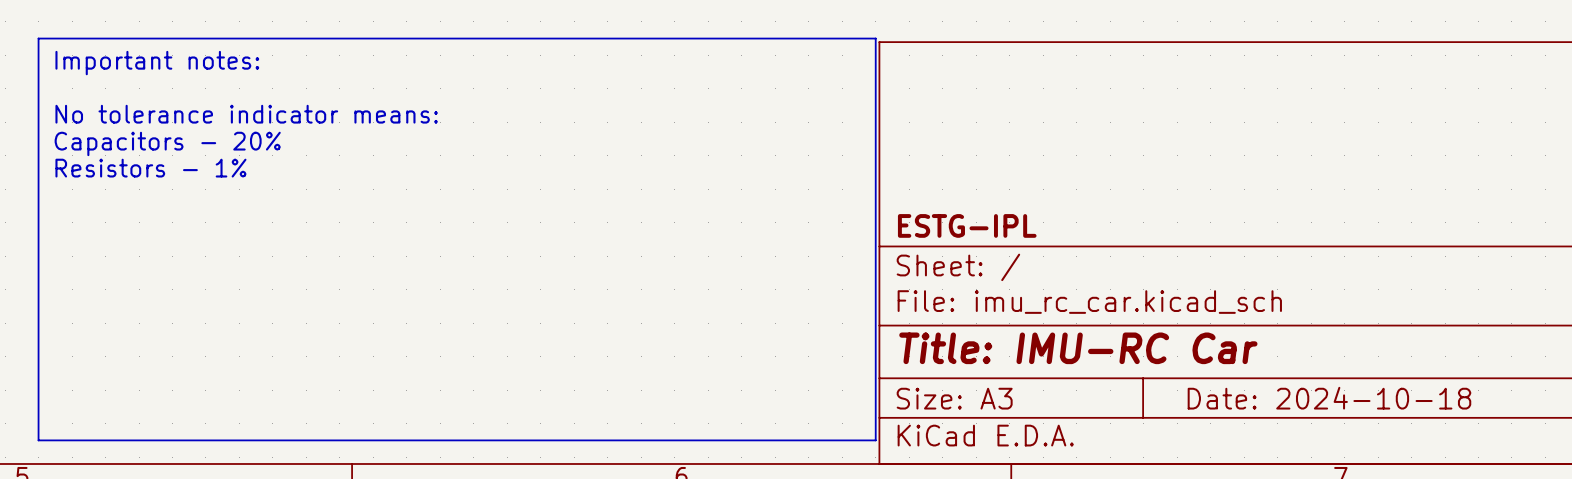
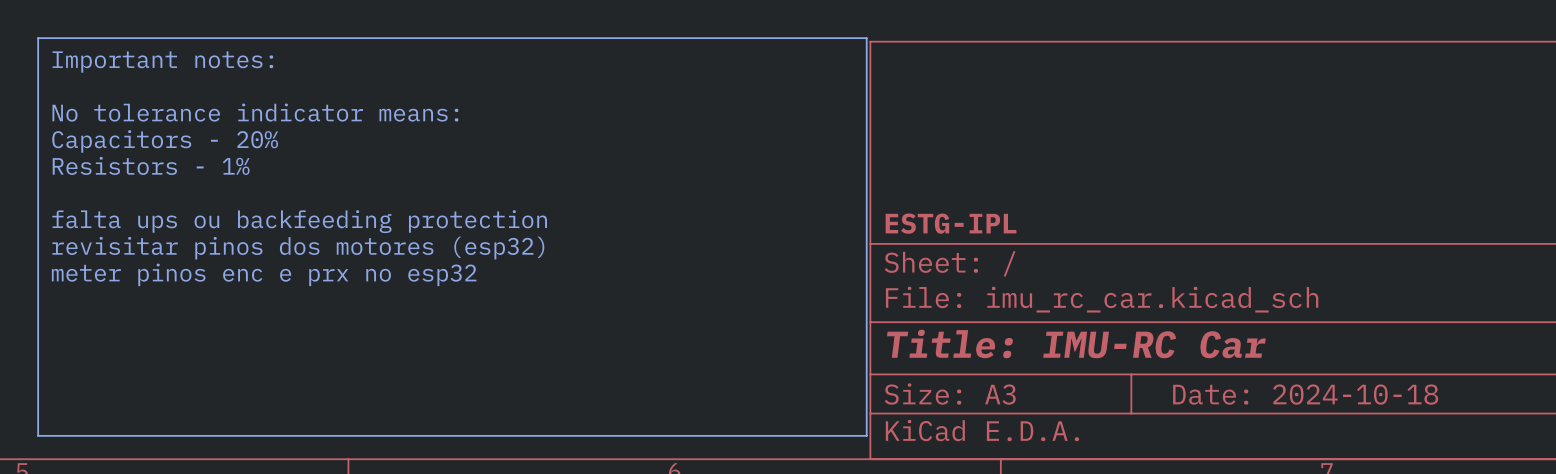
text: none -> falta ups ou backfeeding protection (299, 221)
text: none -> revisitar pinos dos motores (esp32) (298, 248)
text: none -> meter pinos enc e prx no esp32 (264, 274)

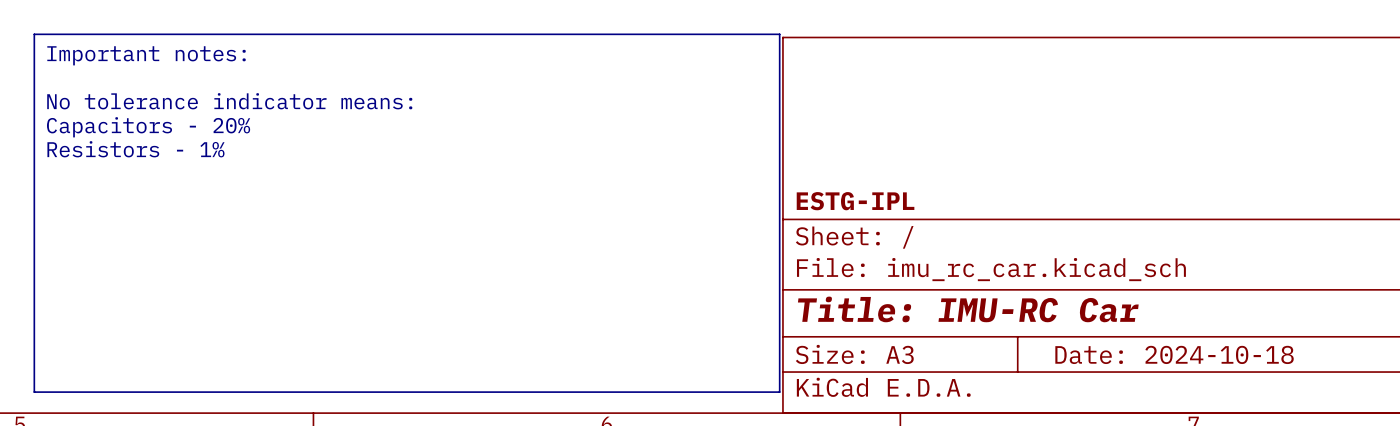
text: falta ups ou backfeeding protection (299, 221) -> none
text: revisitar pinos dos motores (esp32) (298, 248) -> none
text: meter pinos enc e prx no esp32 (264, 274) -> none

